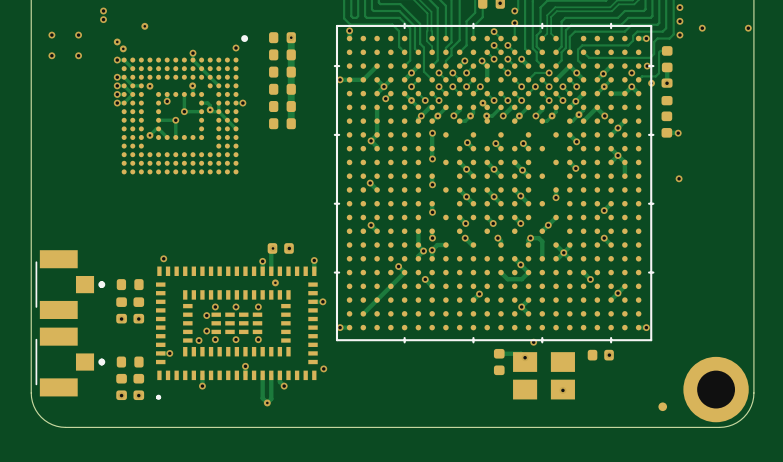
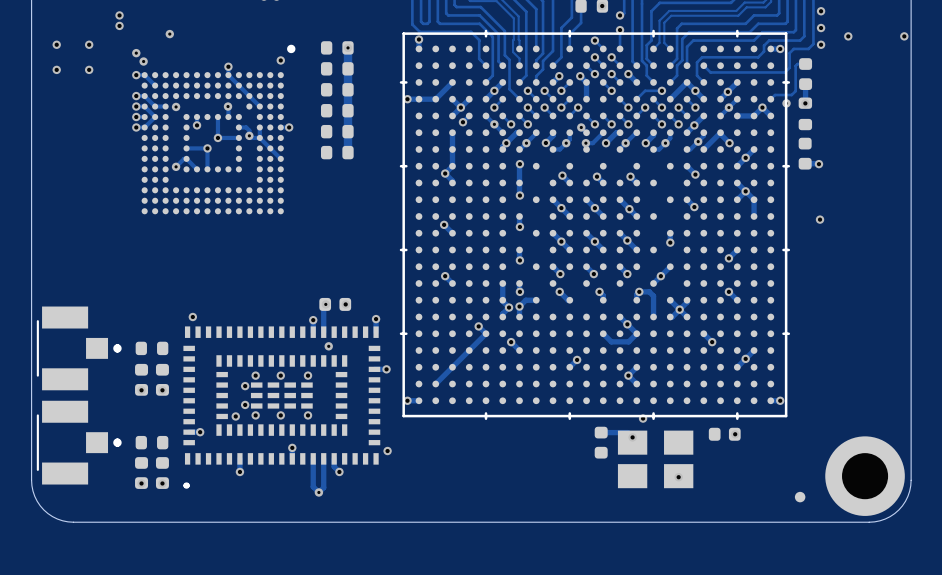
via: (647, 66) -> none
via: (631, 72) -> none

